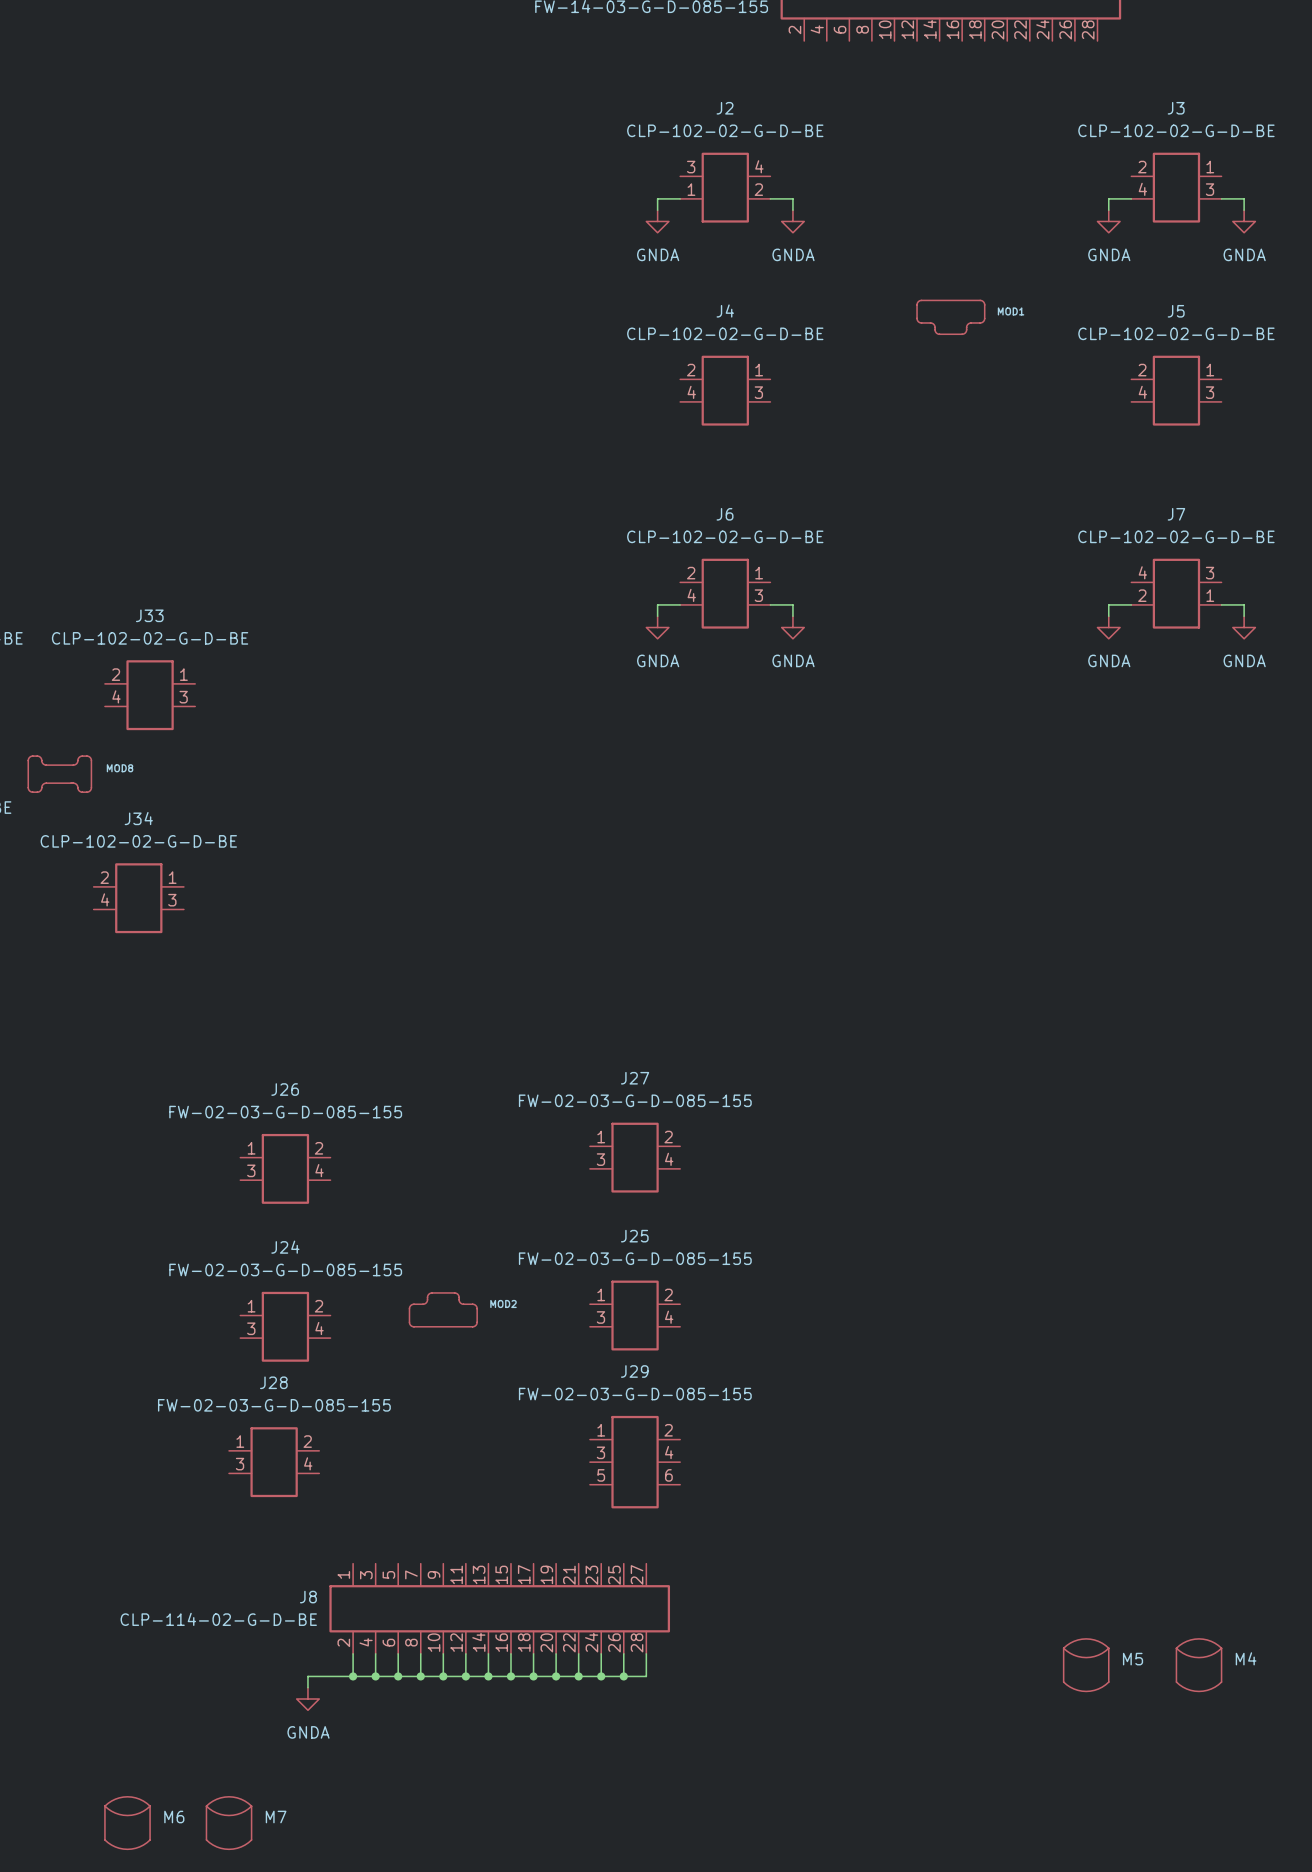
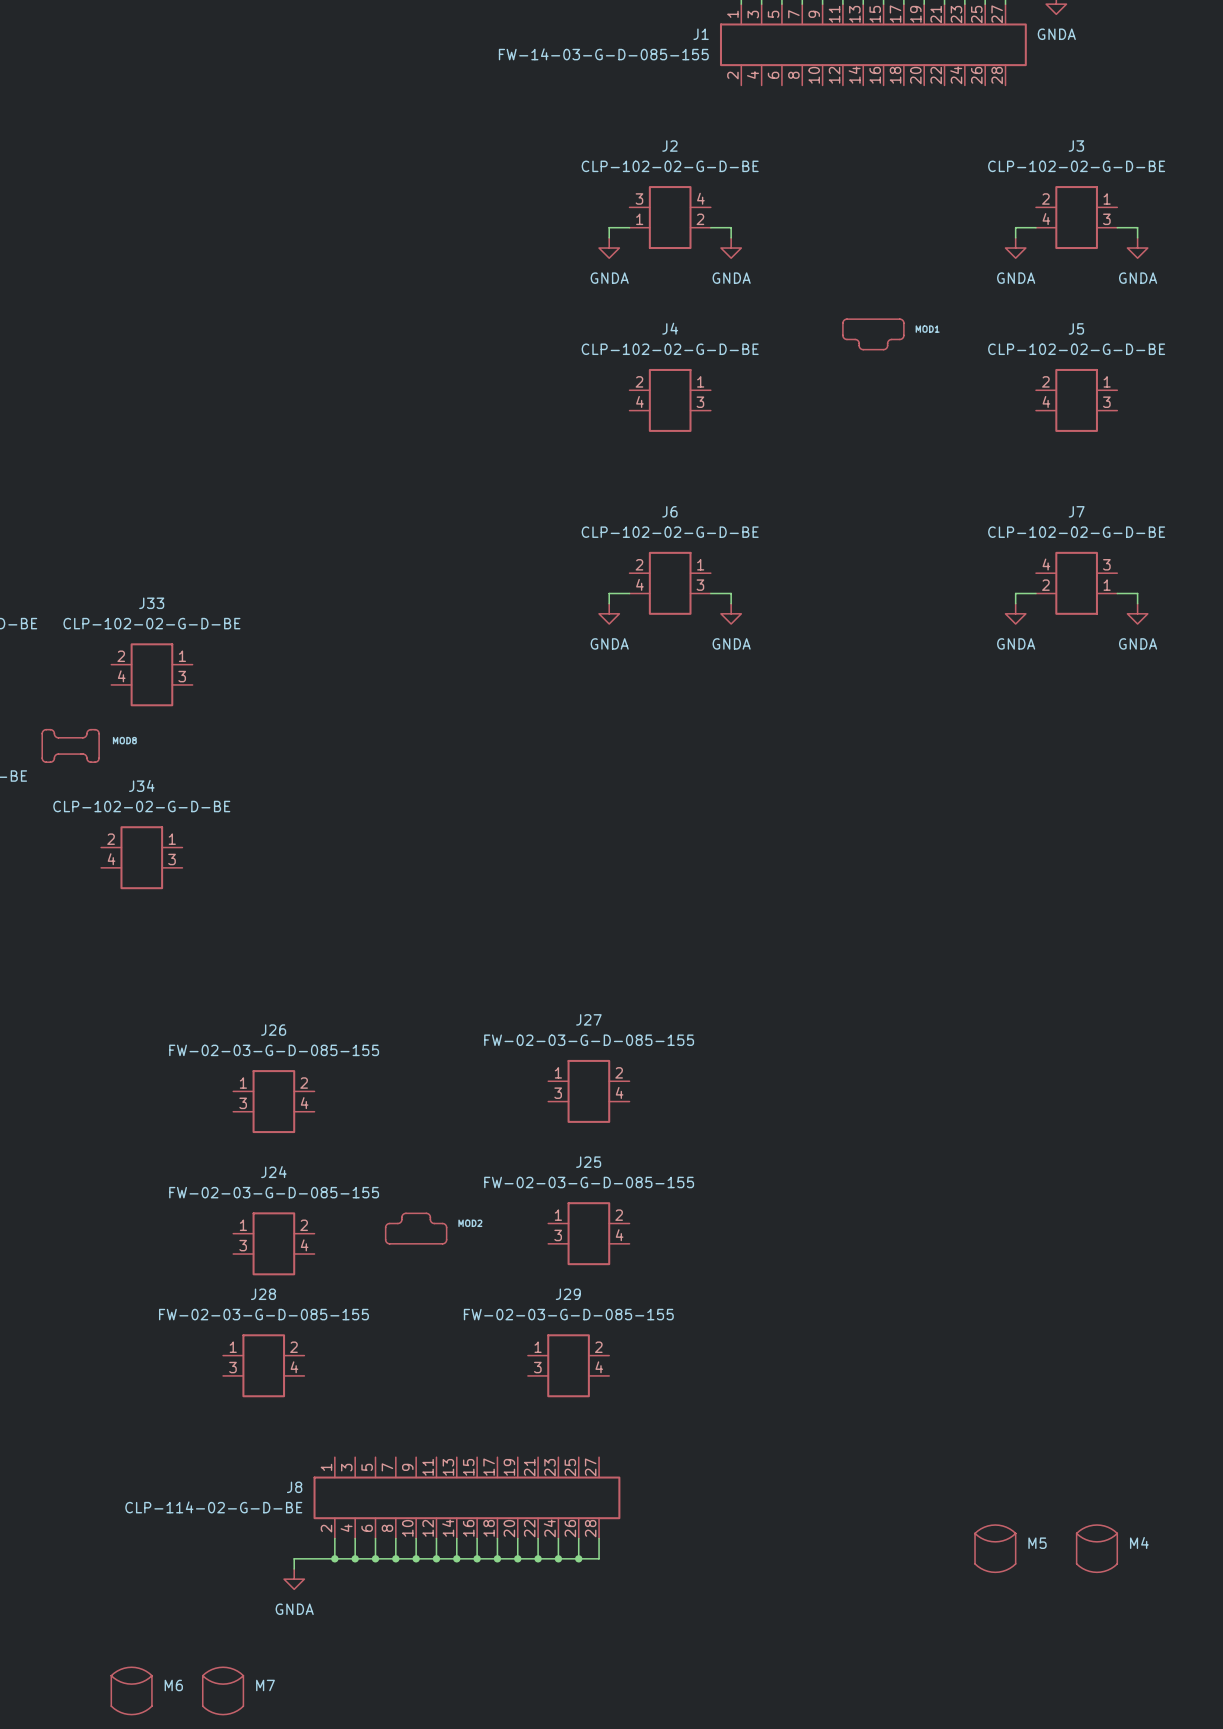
J29 symbol: [589, 1415, 681, 1509] -> [527, 1334, 610, 1398]

